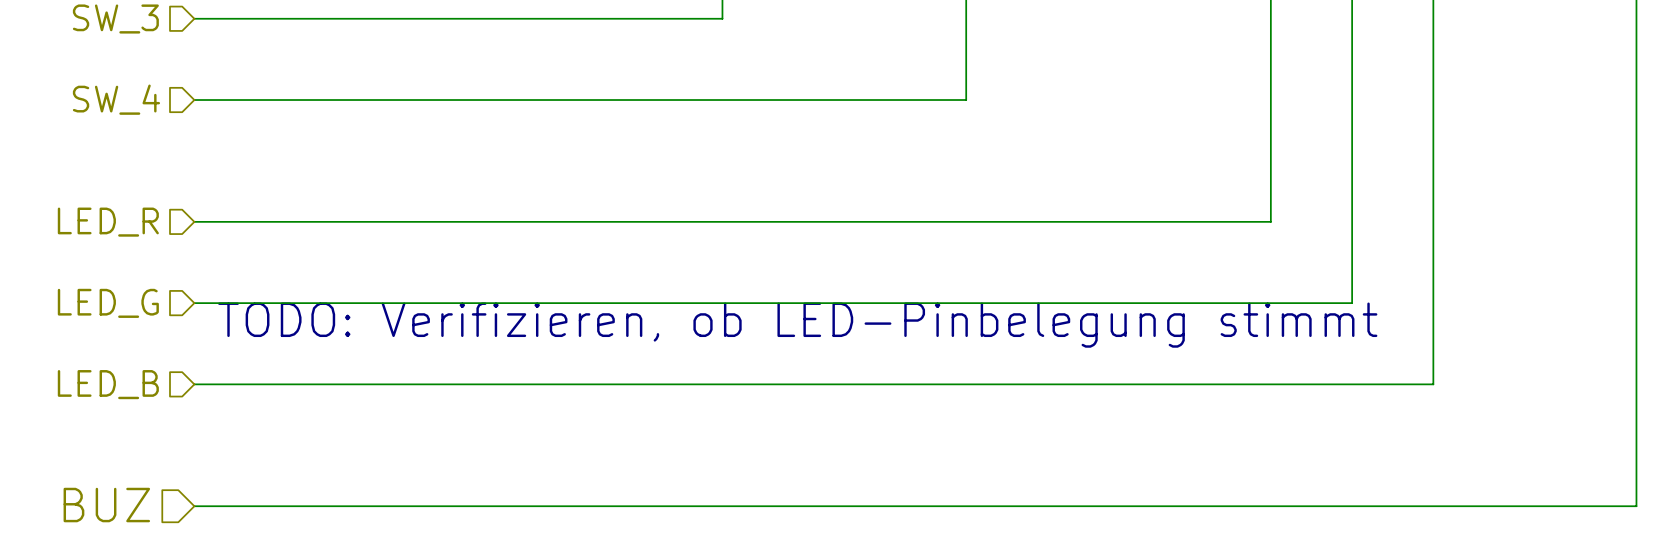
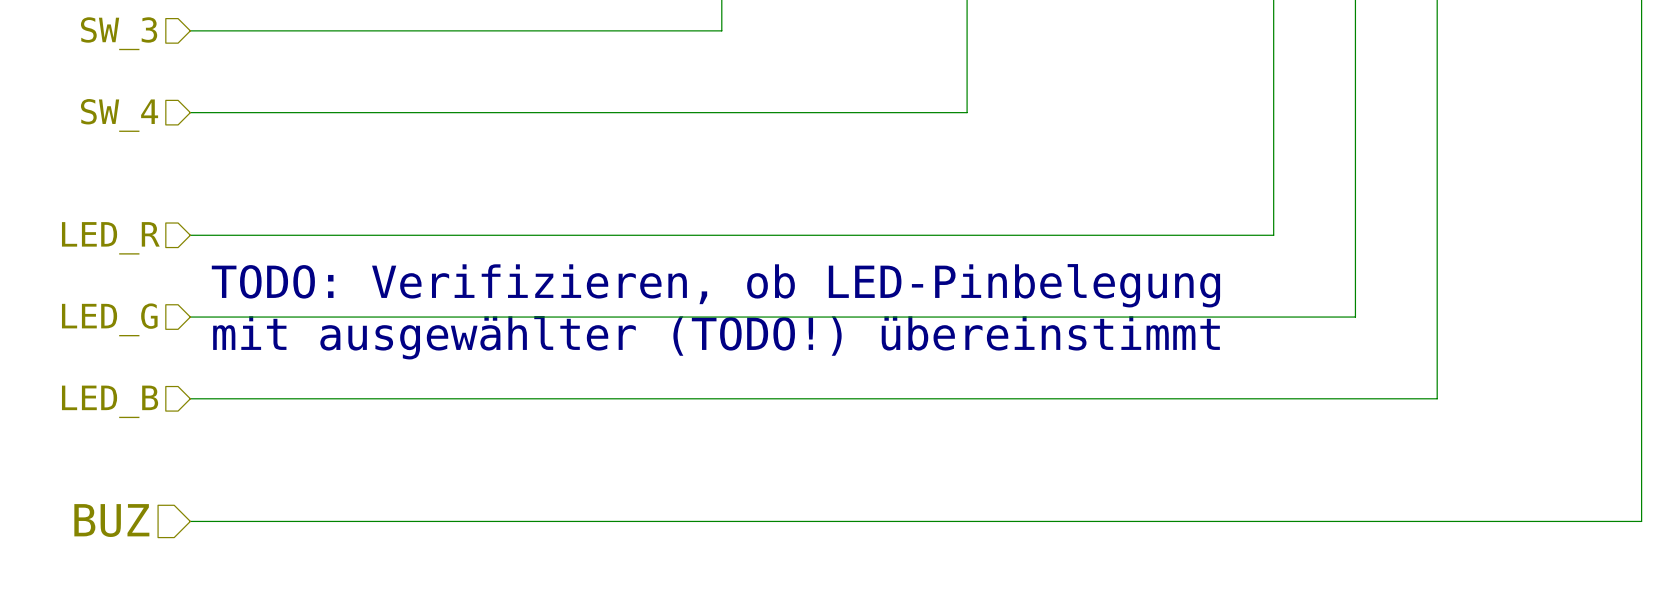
text: none -> TODO: Verifizieren, ob LED-Pinbelegung (715, 285)
text: TODO: Verifizieren, ob LED-Pinbelegung stimmt (797, 325) -> mit ausgewählter (TODO!) übereinstimmt (716, 337)

